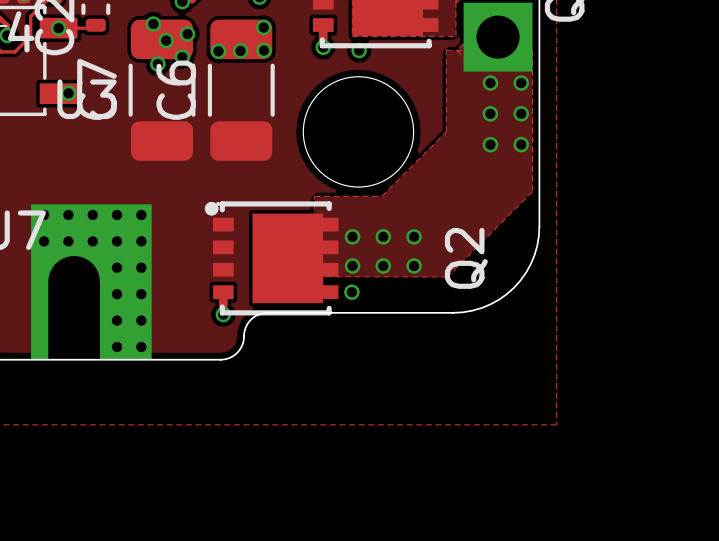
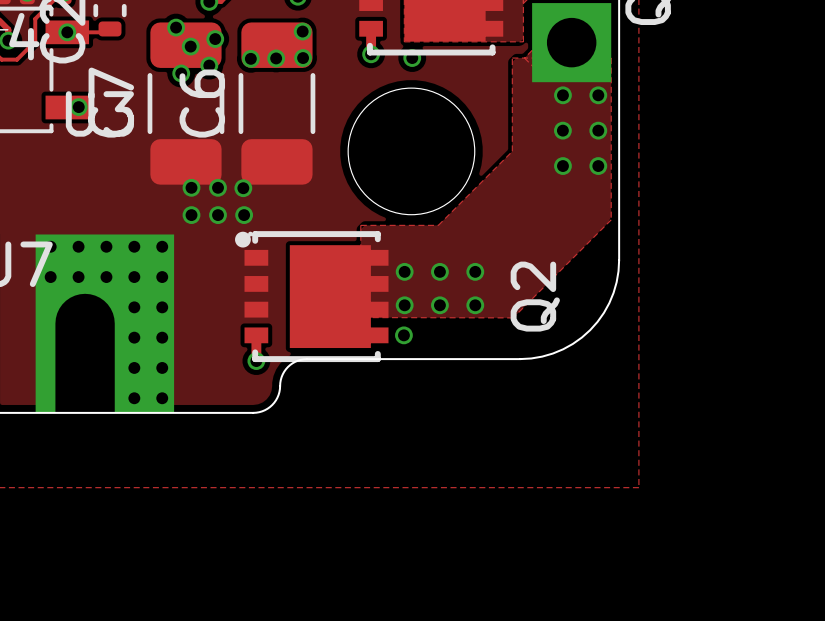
via: none -> (191, 187)
via: none -> (218, 187)
via: none -> (243, 188)
via: none -> (191, 215)
via: none -> (218, 215)
via: none -> (244, 215)

